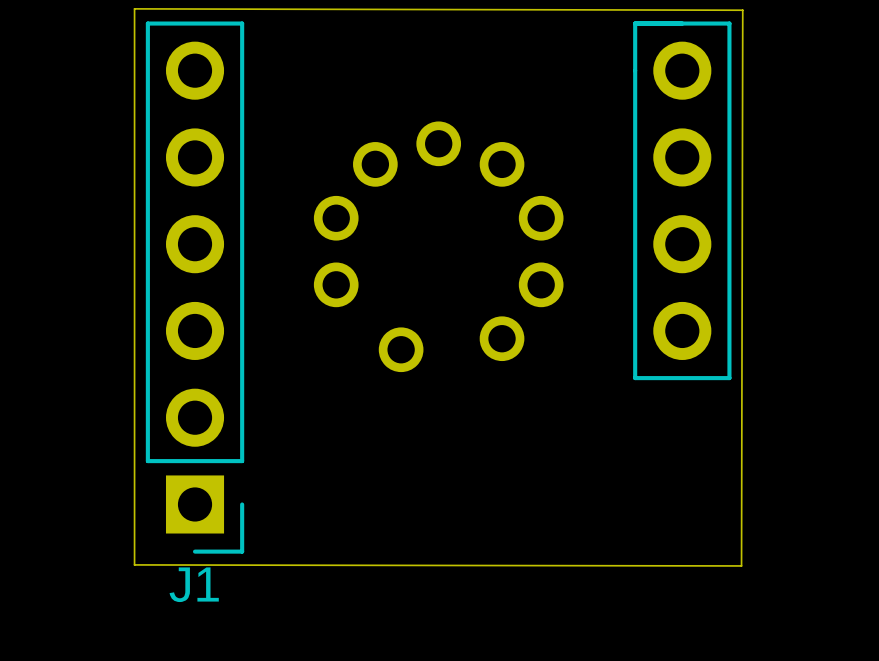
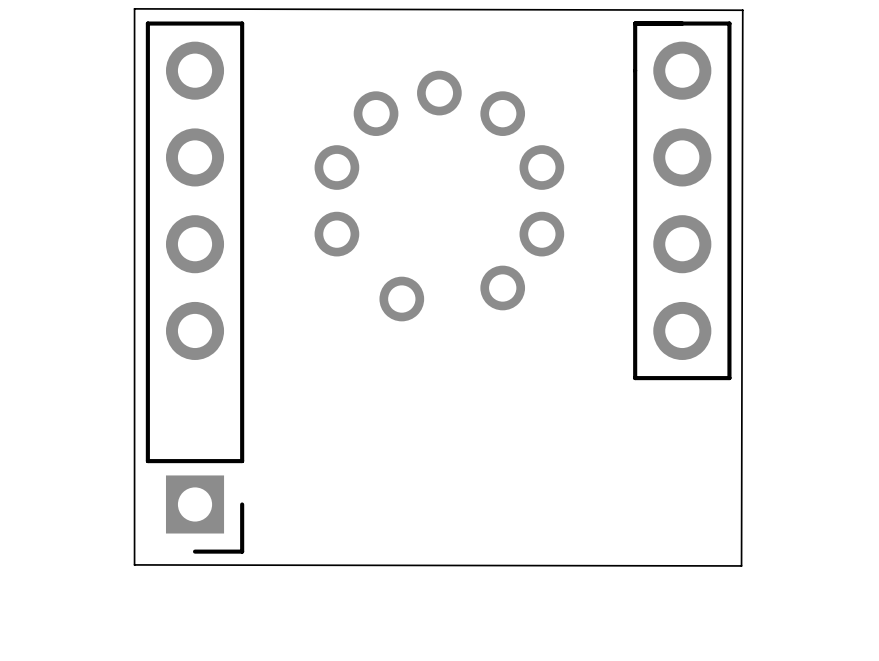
part position: (438, 246) -> (439, 196)
J1: (195, 287) -> none

